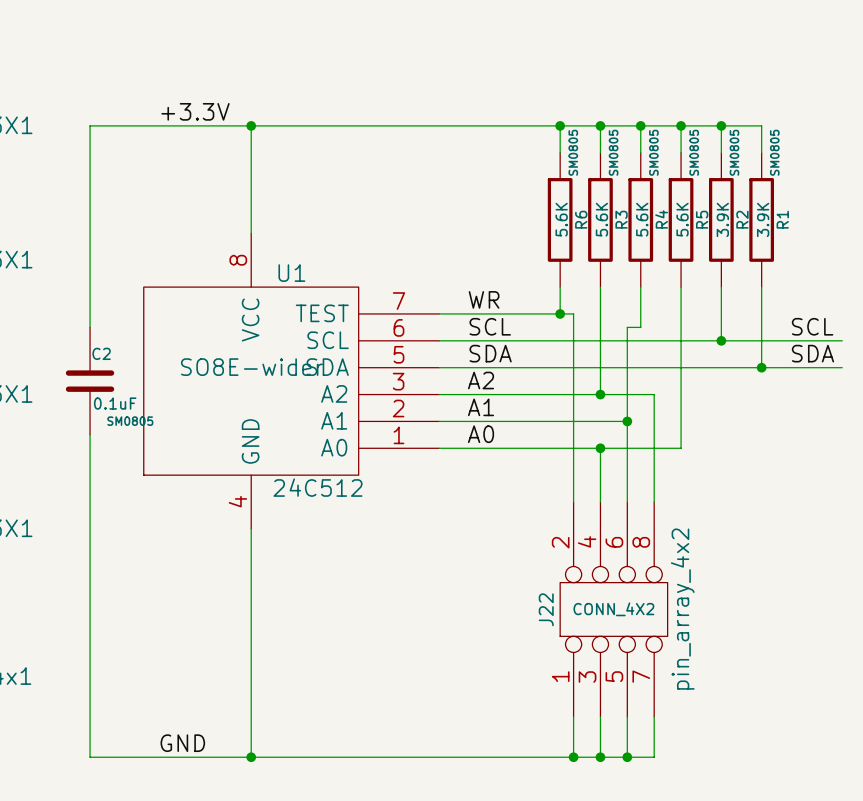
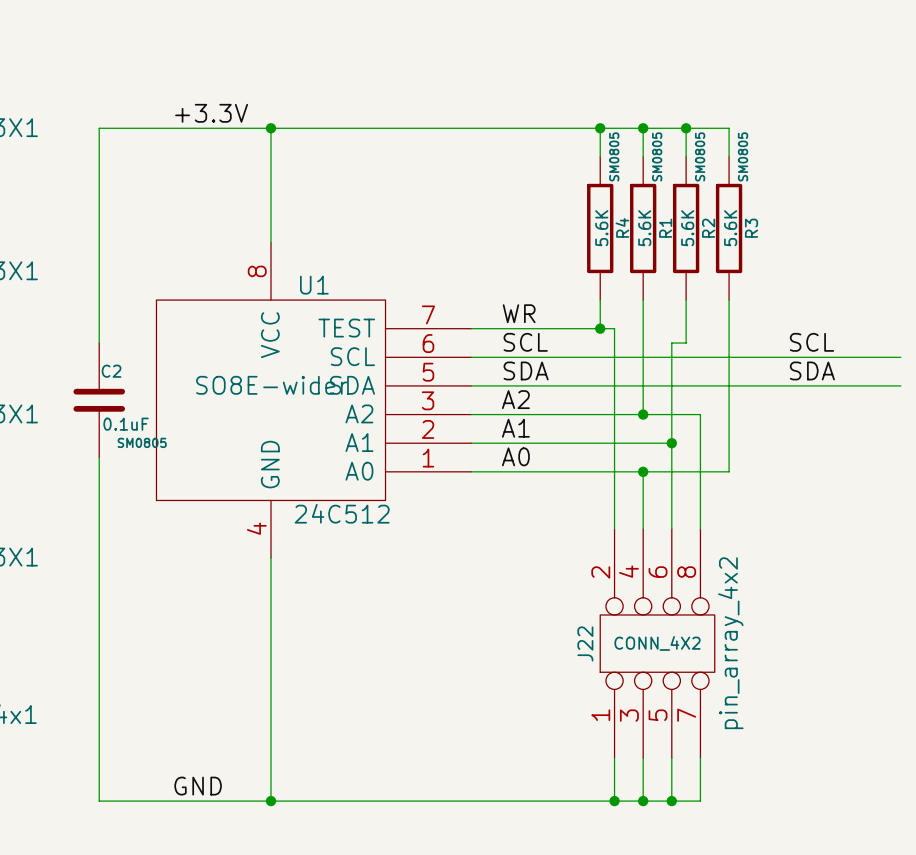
wire: (681, 125) (761, 125) (761, 152) -> none
junction: (681, 125) -> none
wire: (721, 125) (721, 152) -> none
junction: (721, 125) -> none
R6 name: R6 (581, 219) -> R4 (622, 227)
R3 name: R3 (621, 219) -> R1 (665, 228)
R4 name: R4 (661, 219) -> R2 (708, 228)
R5 name: R5 (702, 219) -> R3 (751, 228)
R2: 3.9K (721, 219) -> none
R1: 3.9K (761, 219) -> none
wire: (721, 287) (721, 340) -> none
wire: (761, 287) (761, 367) -> none
label position: SCL (812, 326) -> SCL (811, 342)
junction: (721, 340) -> none
label position: SDA (812, 353) -> SDA (812, 370)
junction: (761, 367) -> none

